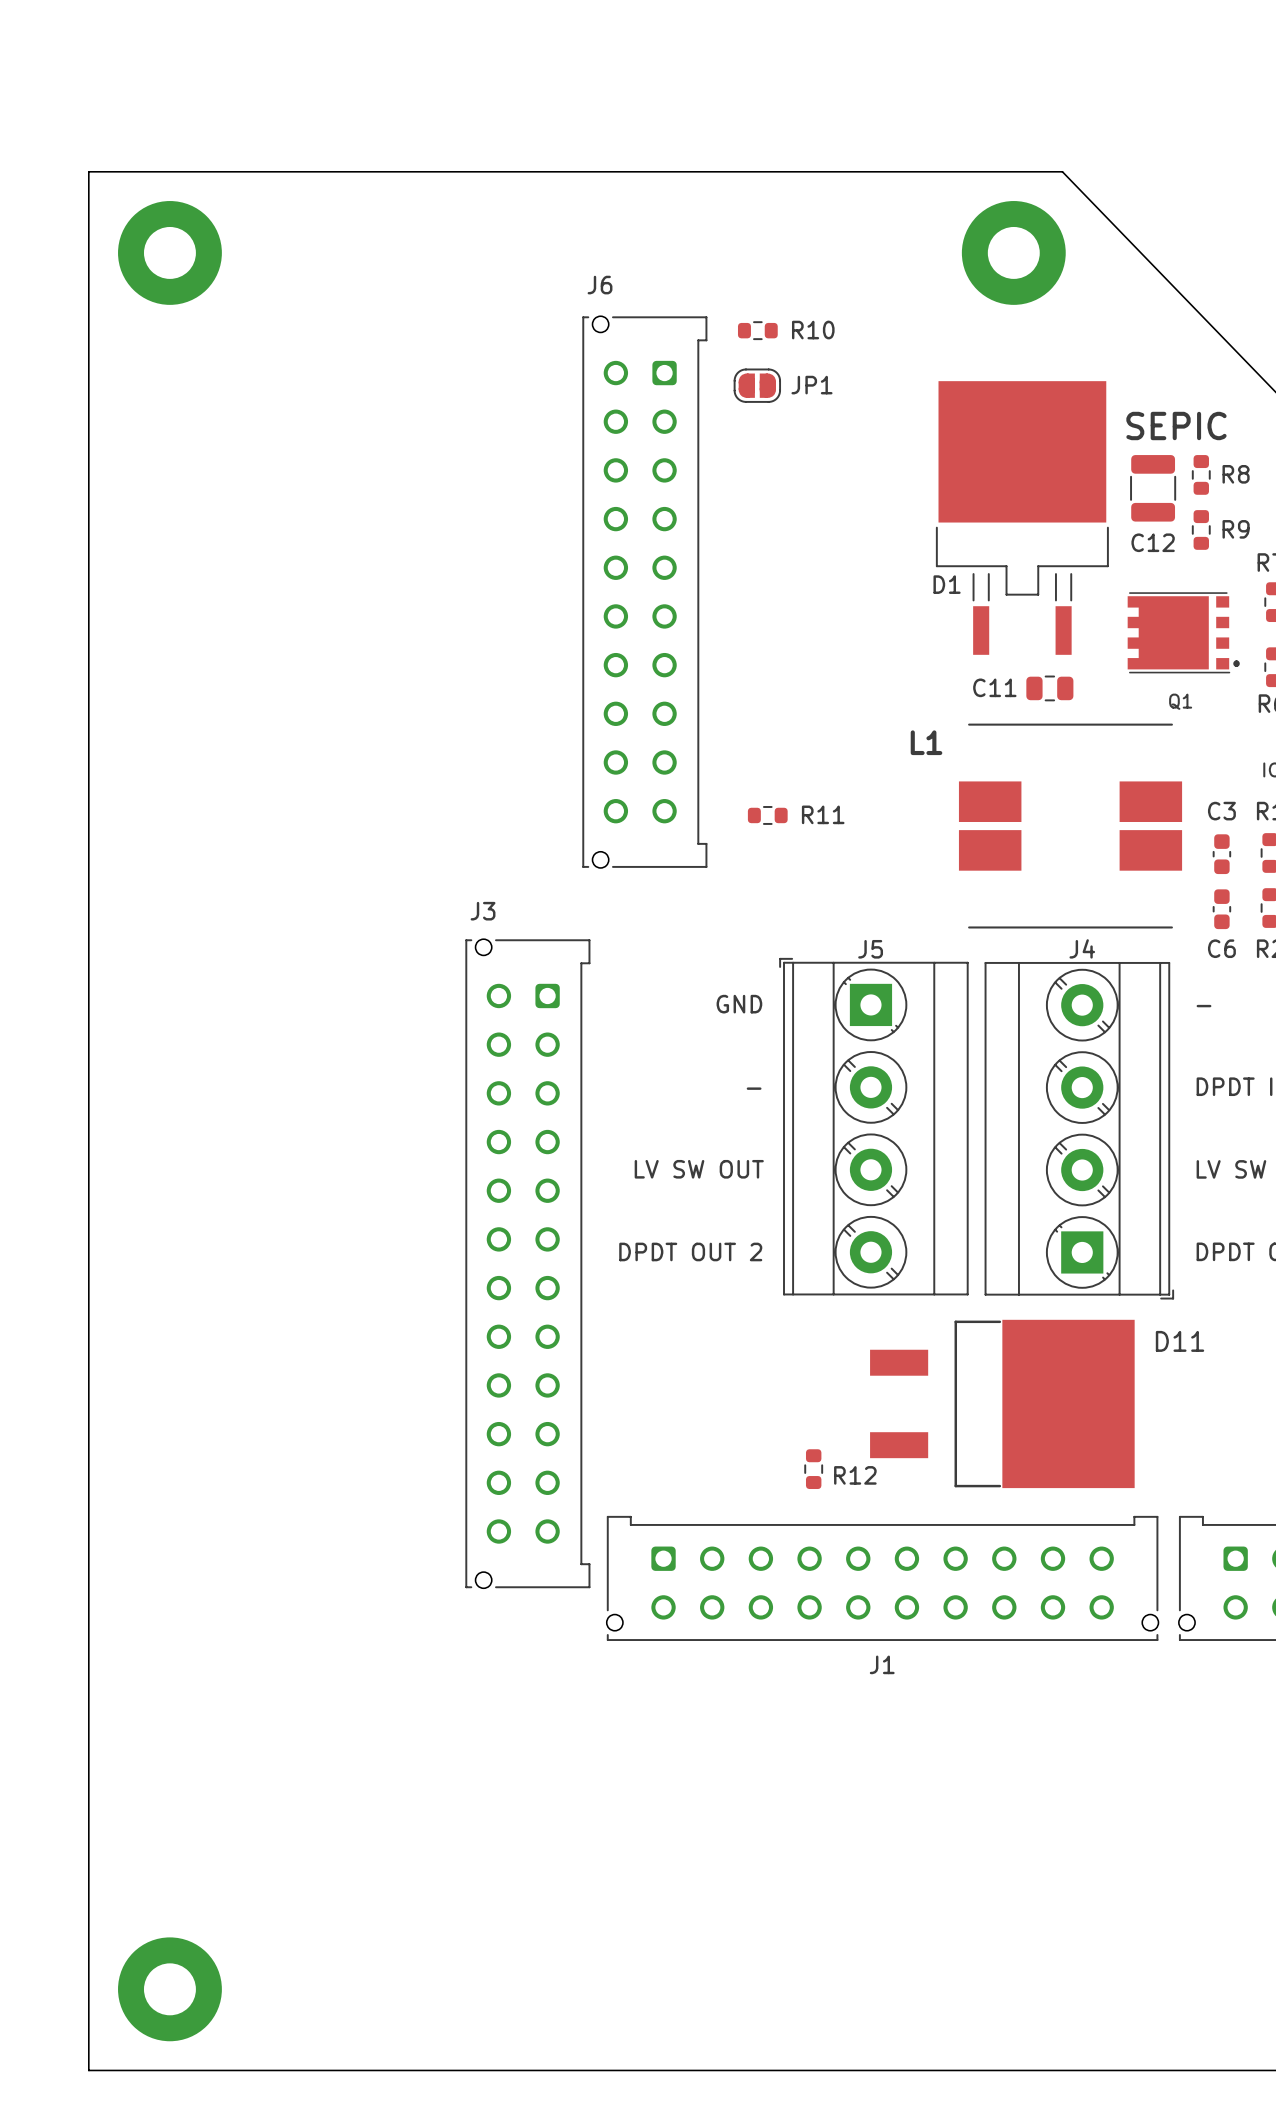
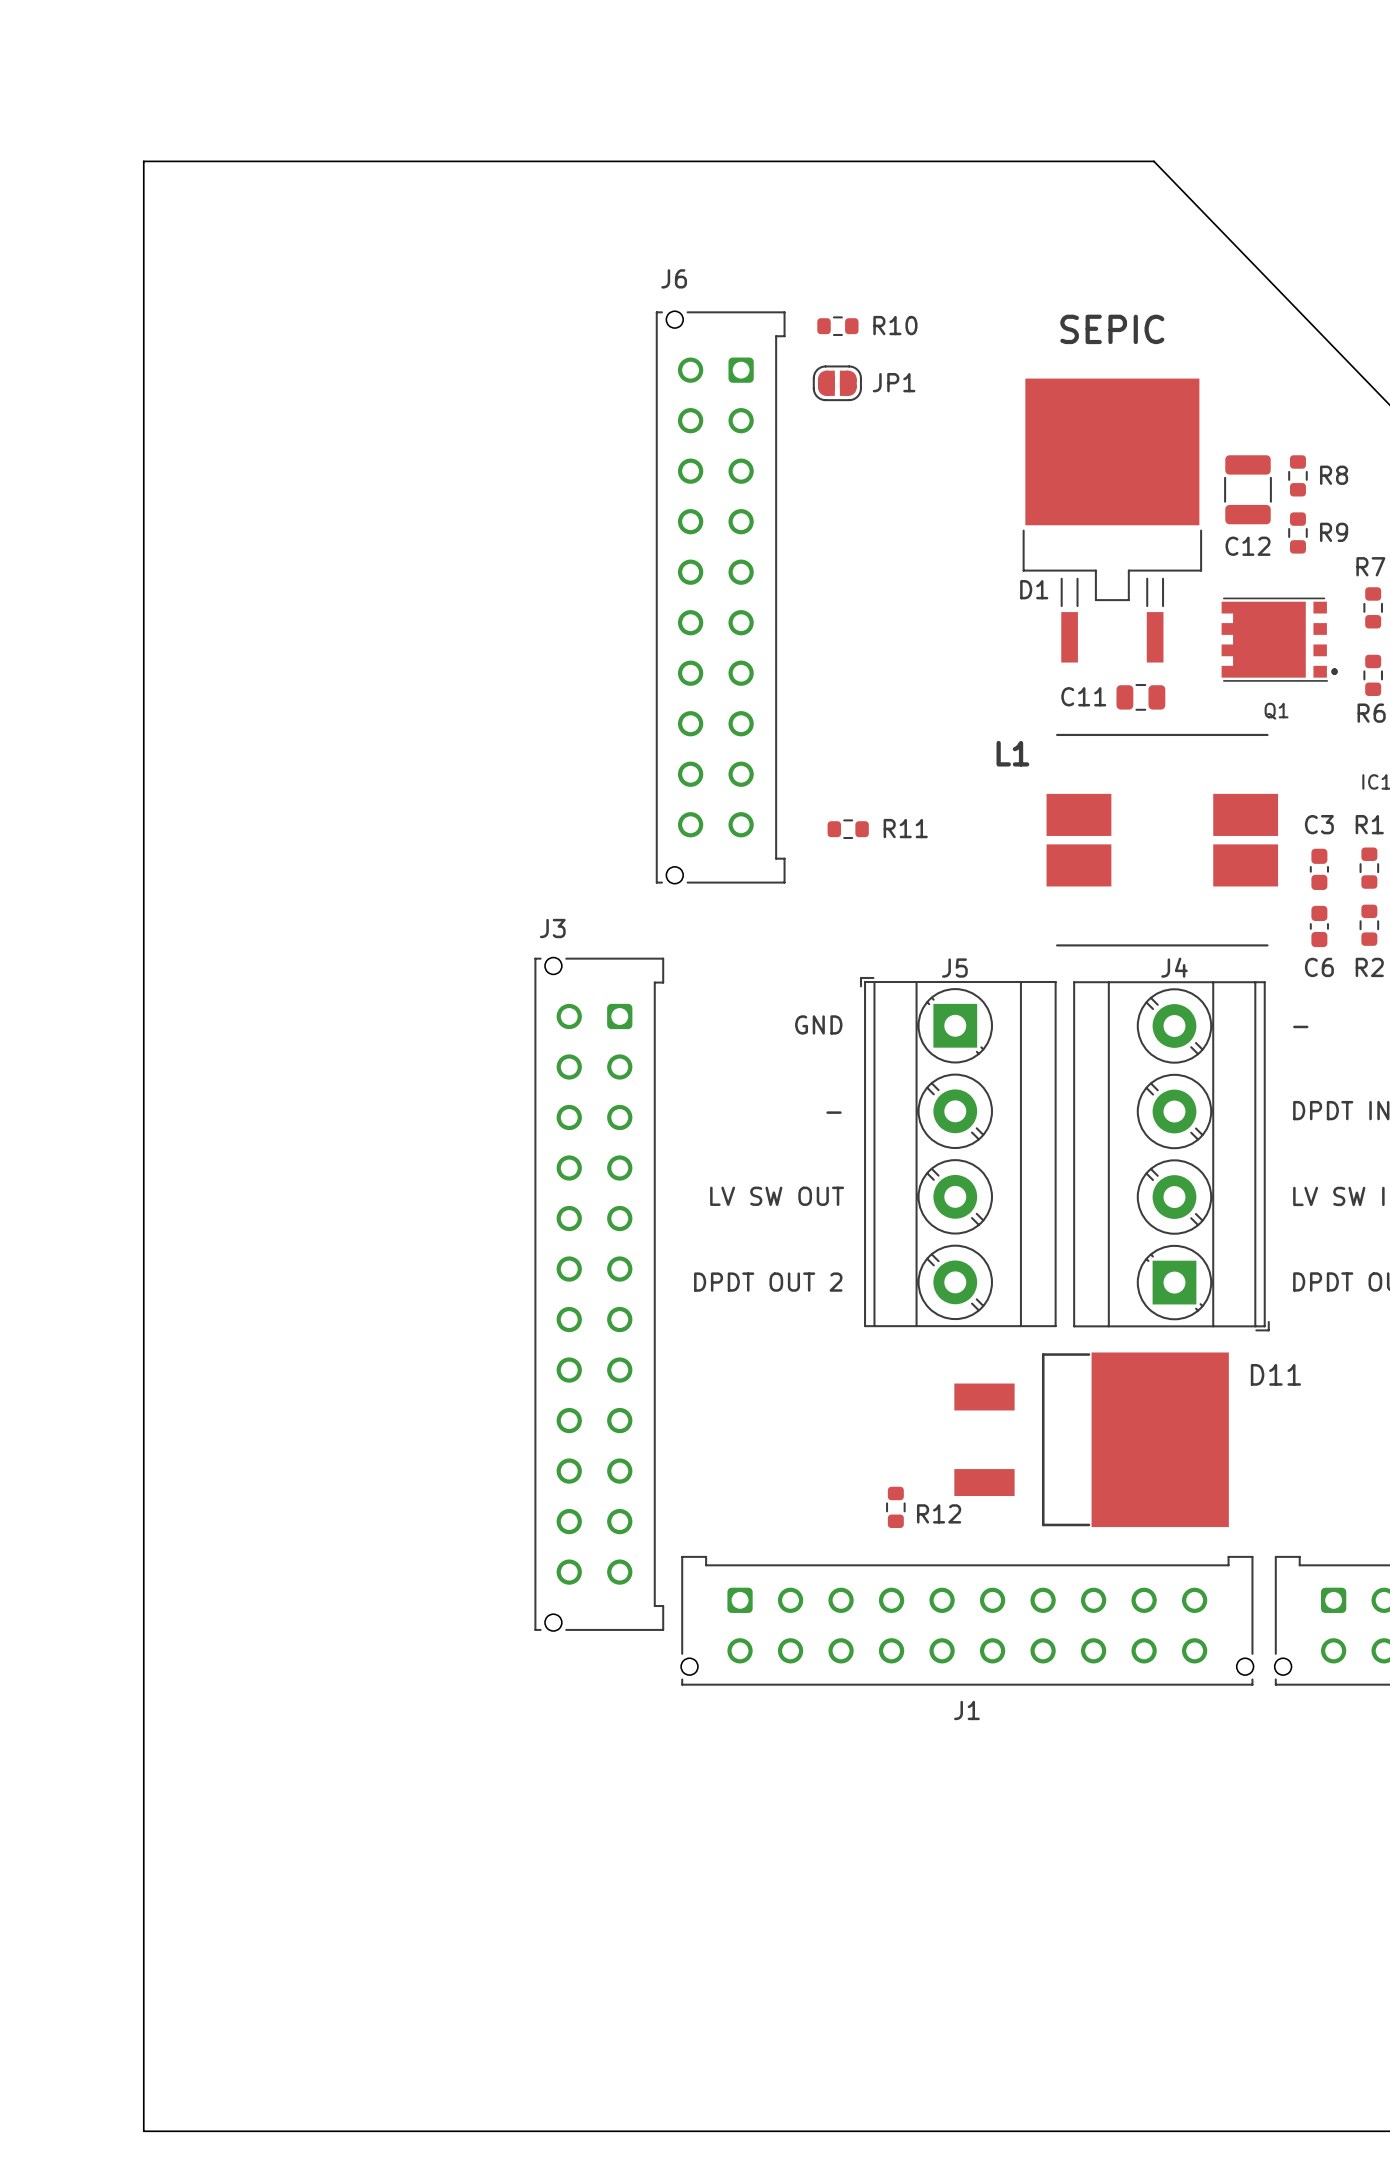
part: (169, 252) -> none
part: (1013, 252) -> none
text position: SEPIC (1176, 426) -> SEPIC (1112, 329)
part: (169, 1989) -> none

